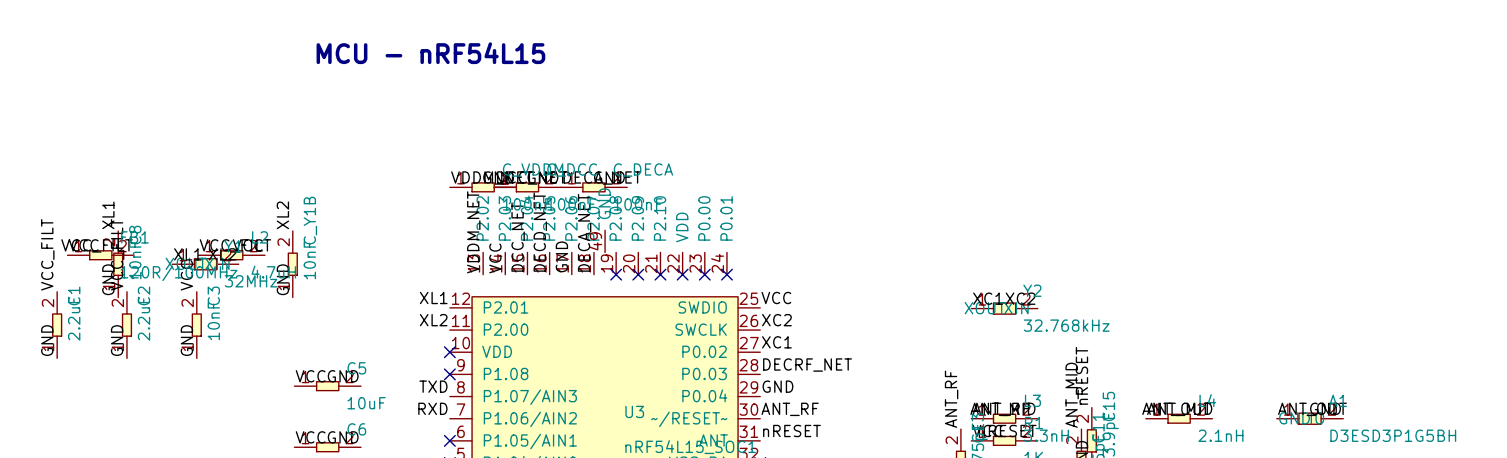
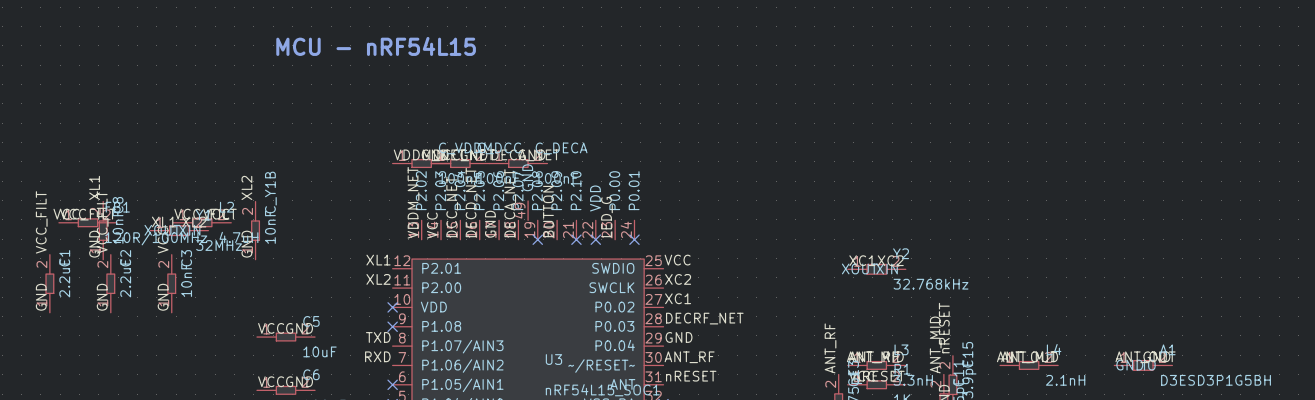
label: none -> BUTTON (548, 211)
label: none -> LED_G (606, 217)
no-connect mark: (638, 274) -> none
no-connect mark: (704, 274) -> none

